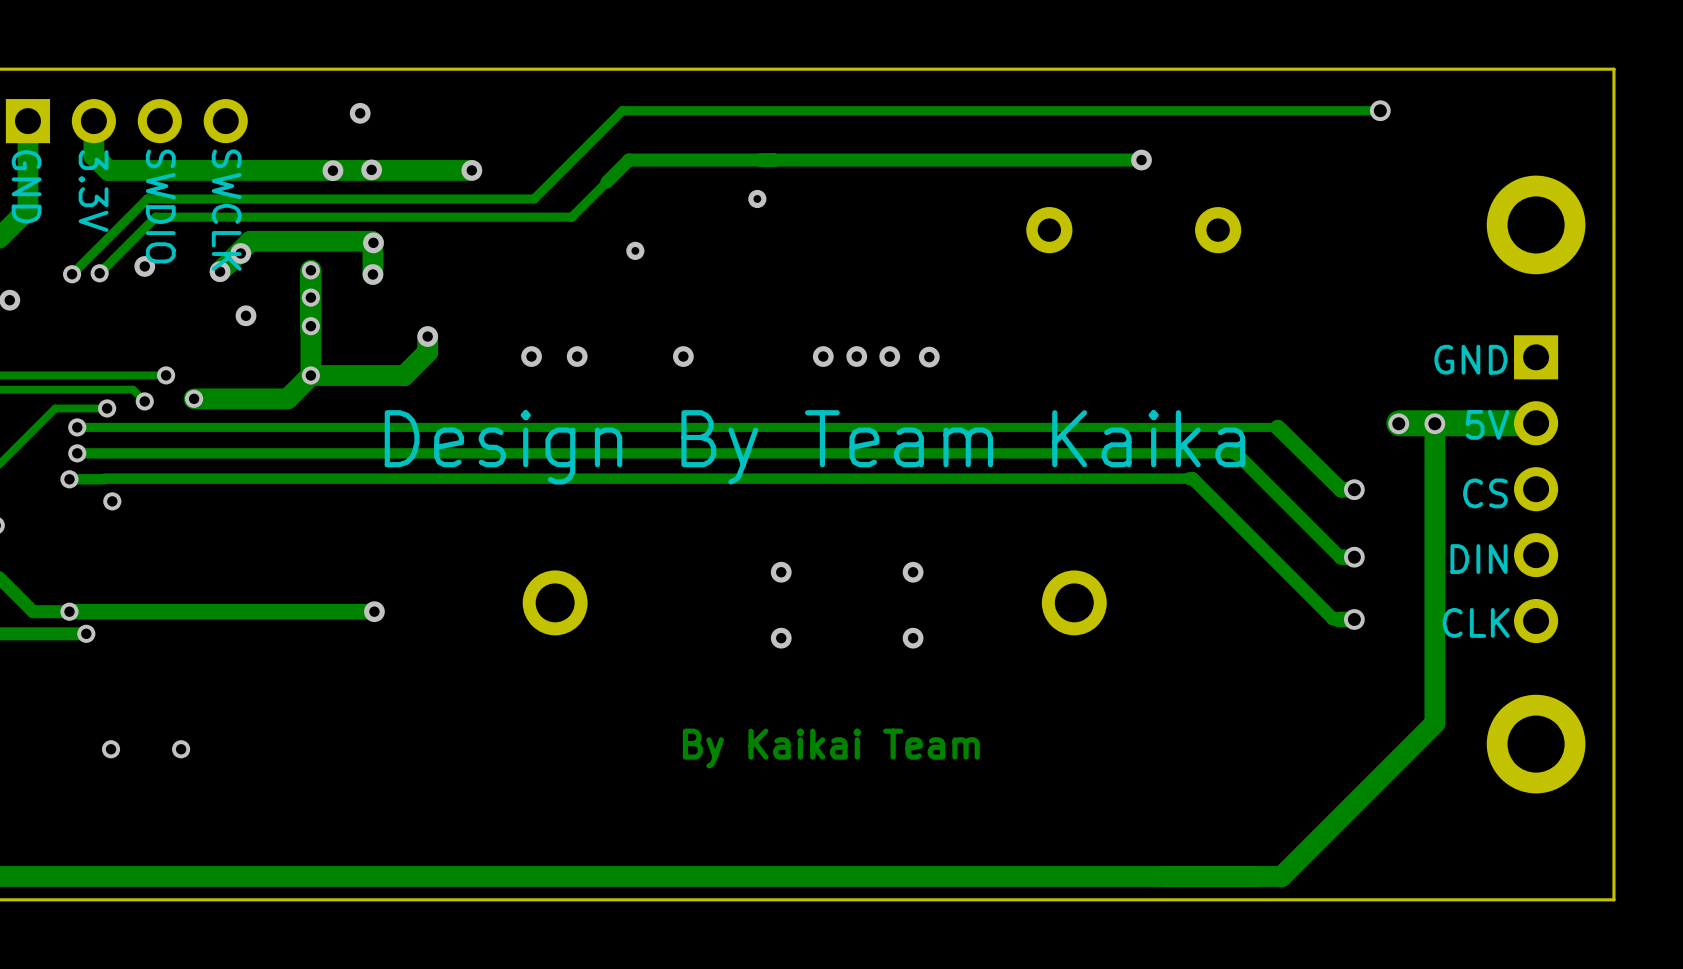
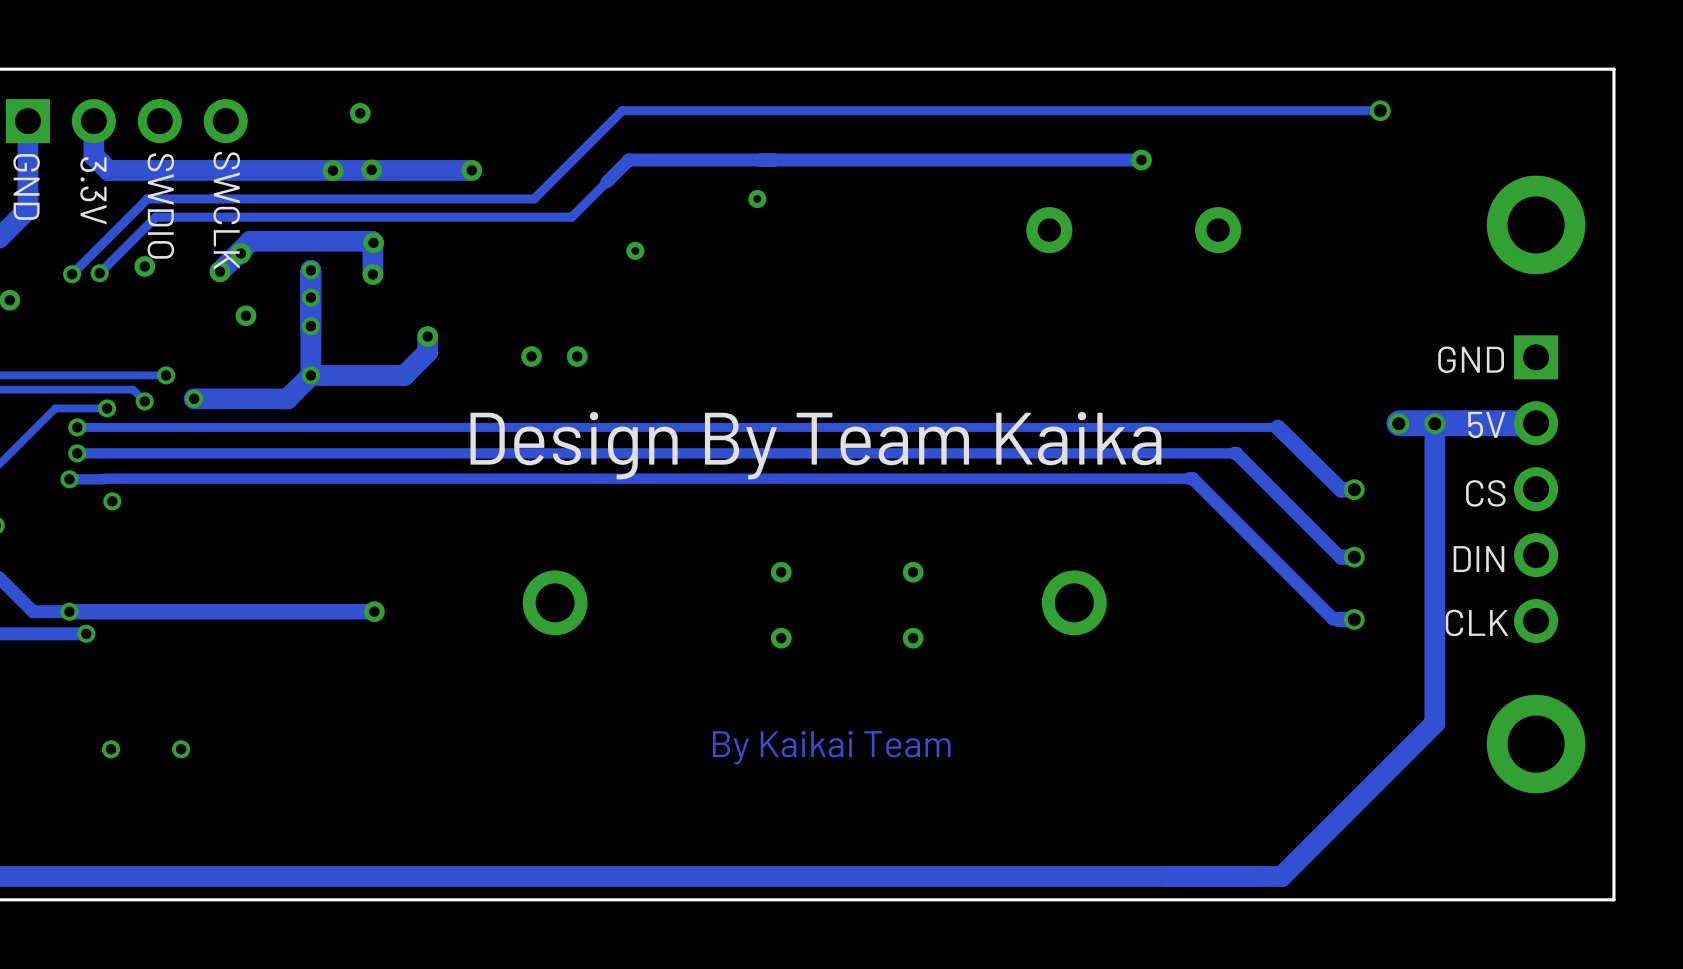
via: (683, 356) -> none
via: (823, 356) -> none
via: (856, 356) -> none
via: (889, 356) -> none
via: (929, 357) -> none

